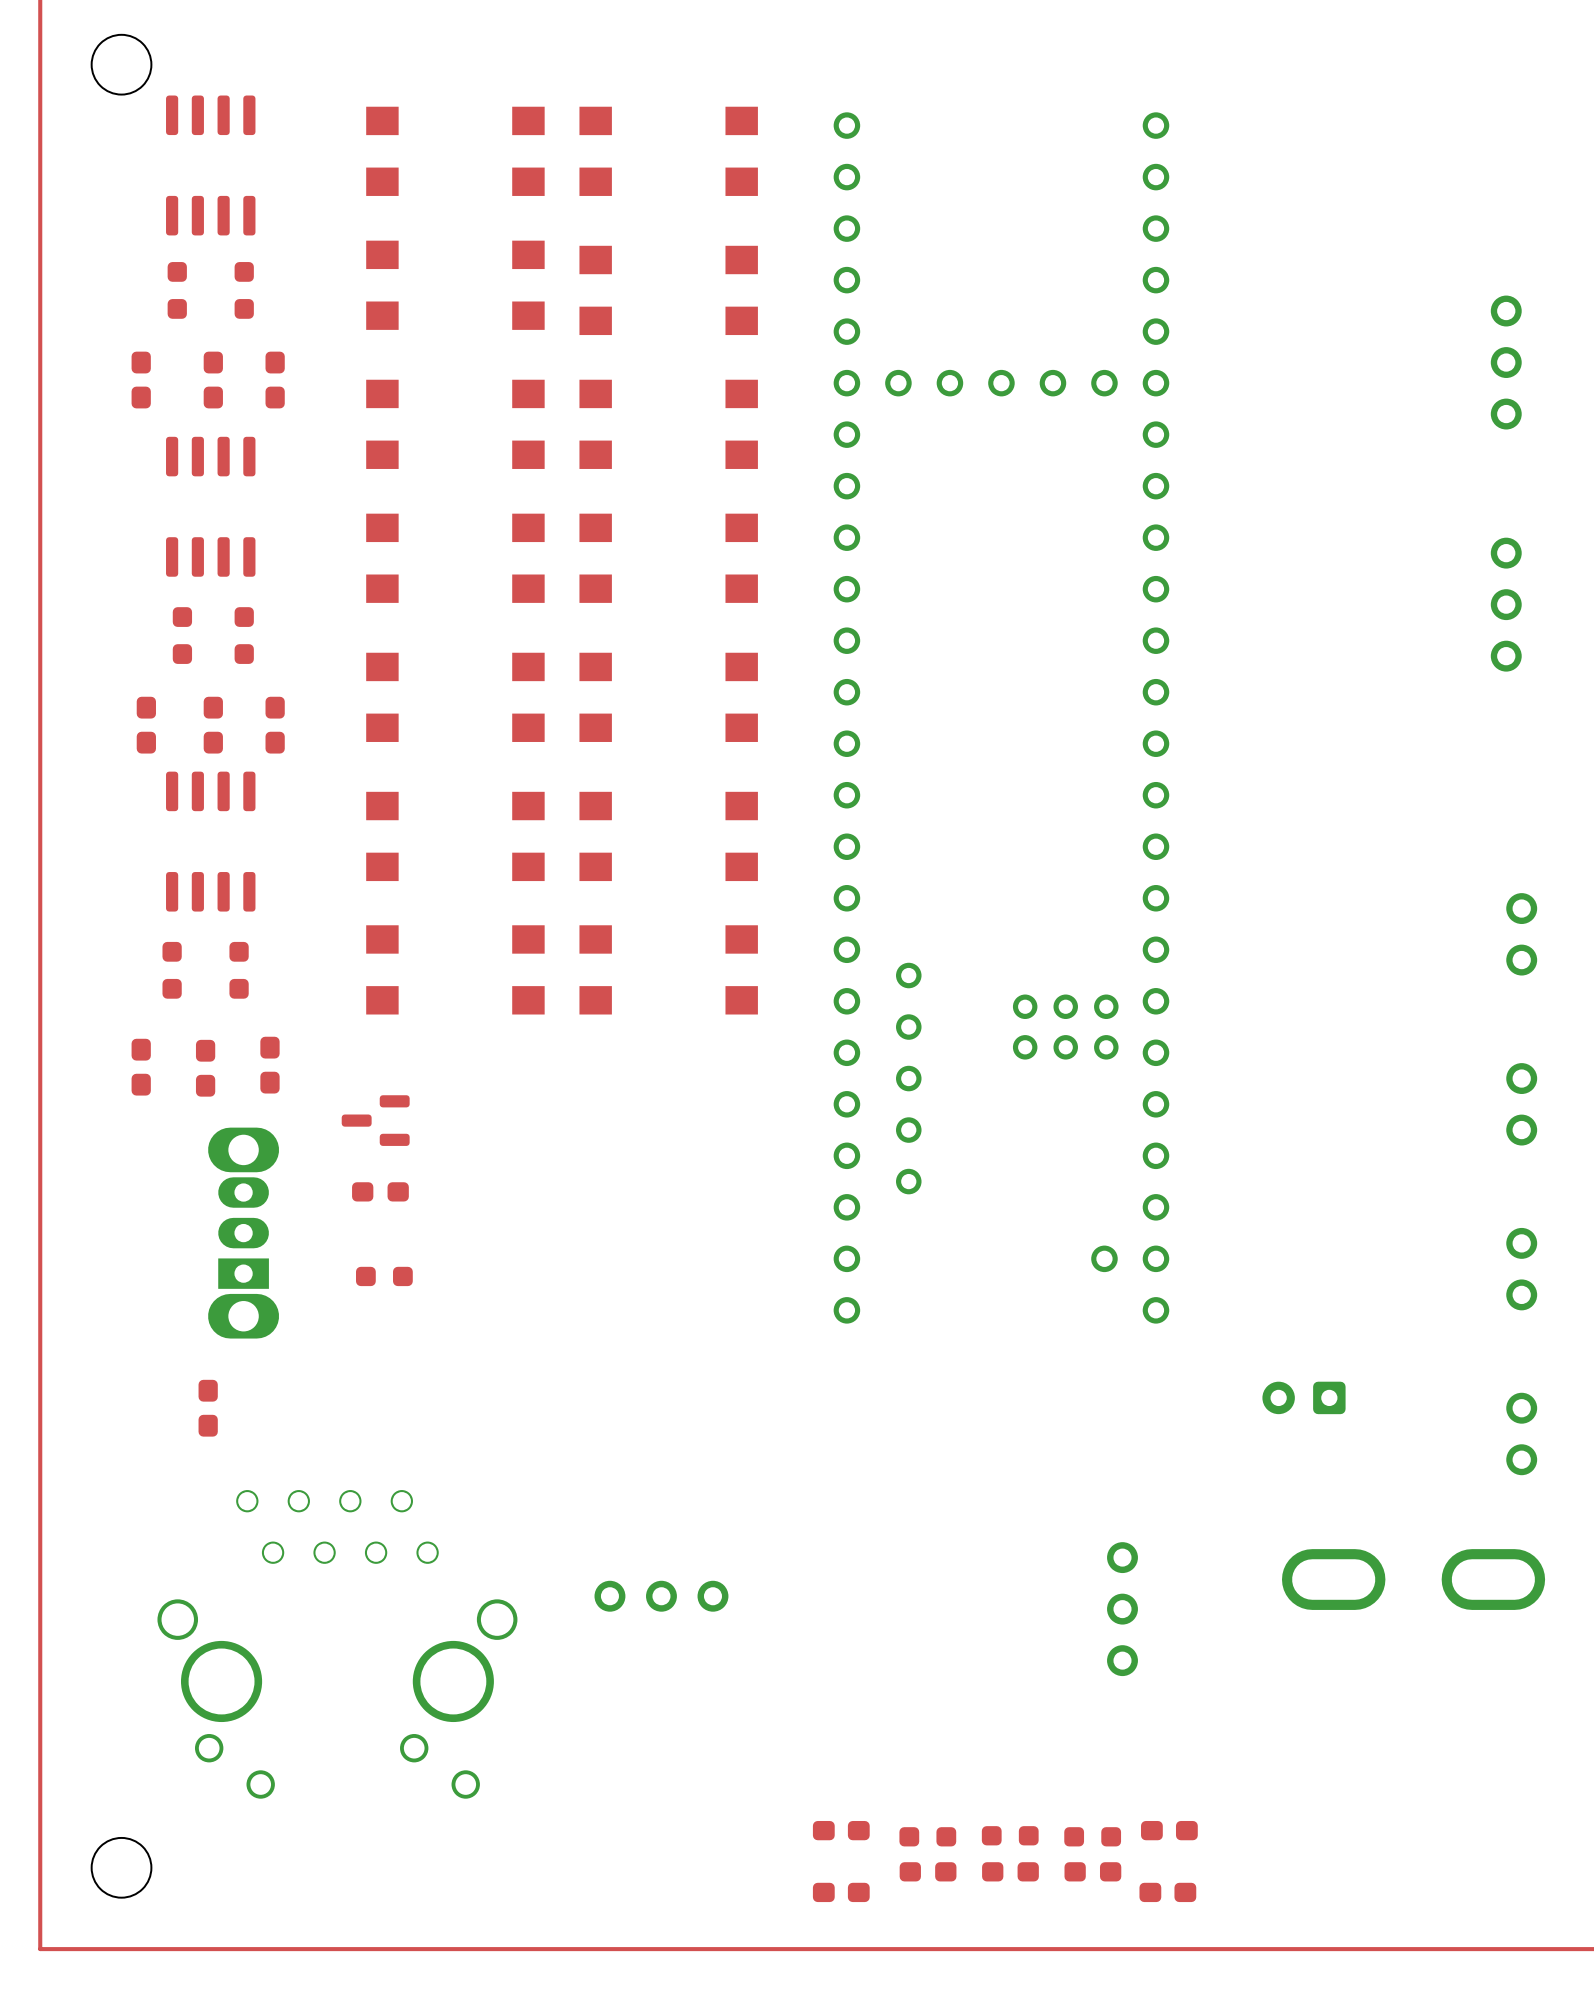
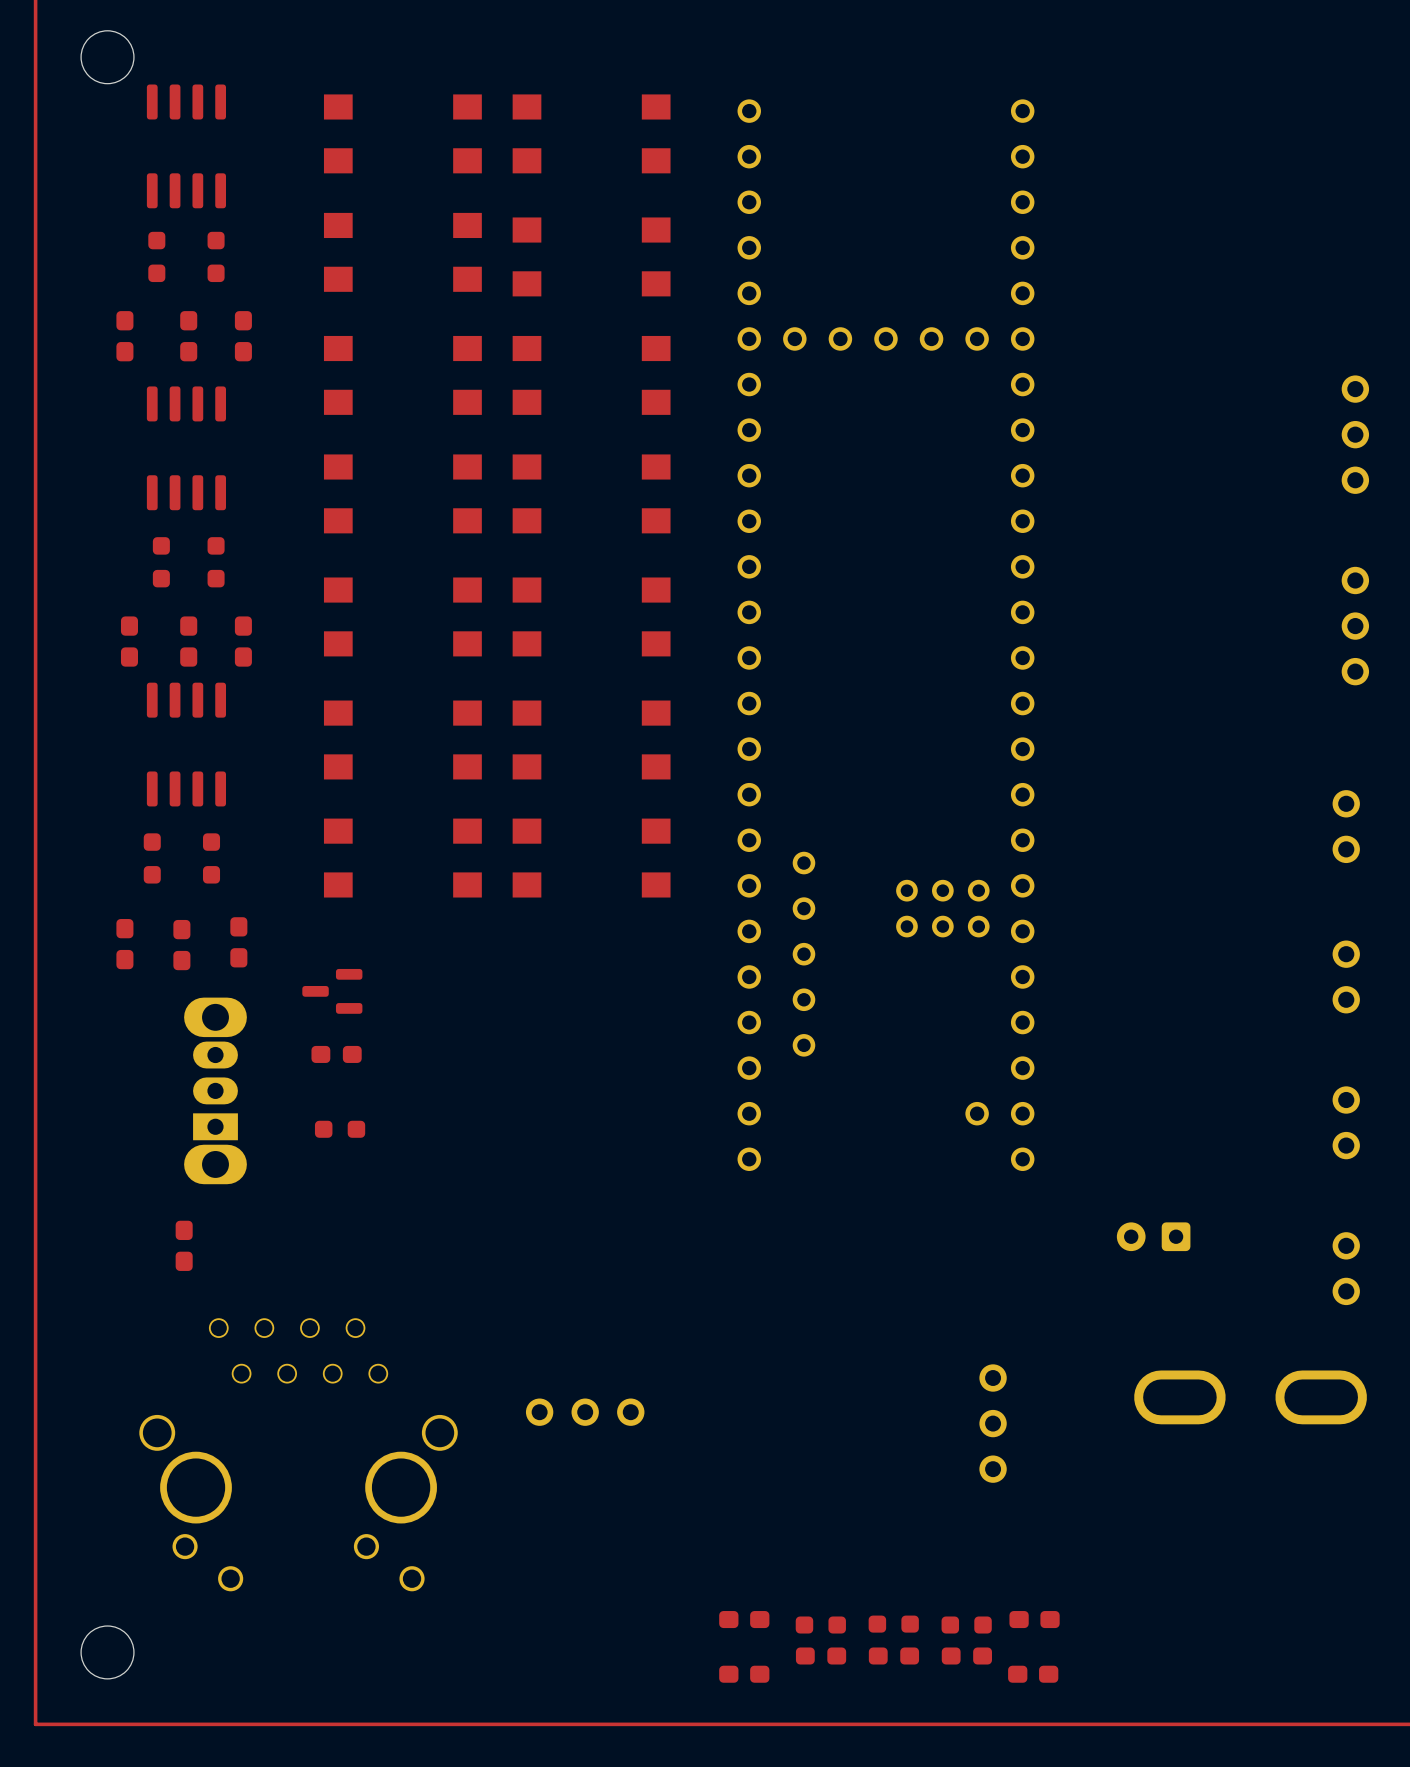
part: (1506, 362) -> none
part: none -> (1355, 434)
part: (1506, 604) -> none
part: none -> (1355, 626)

